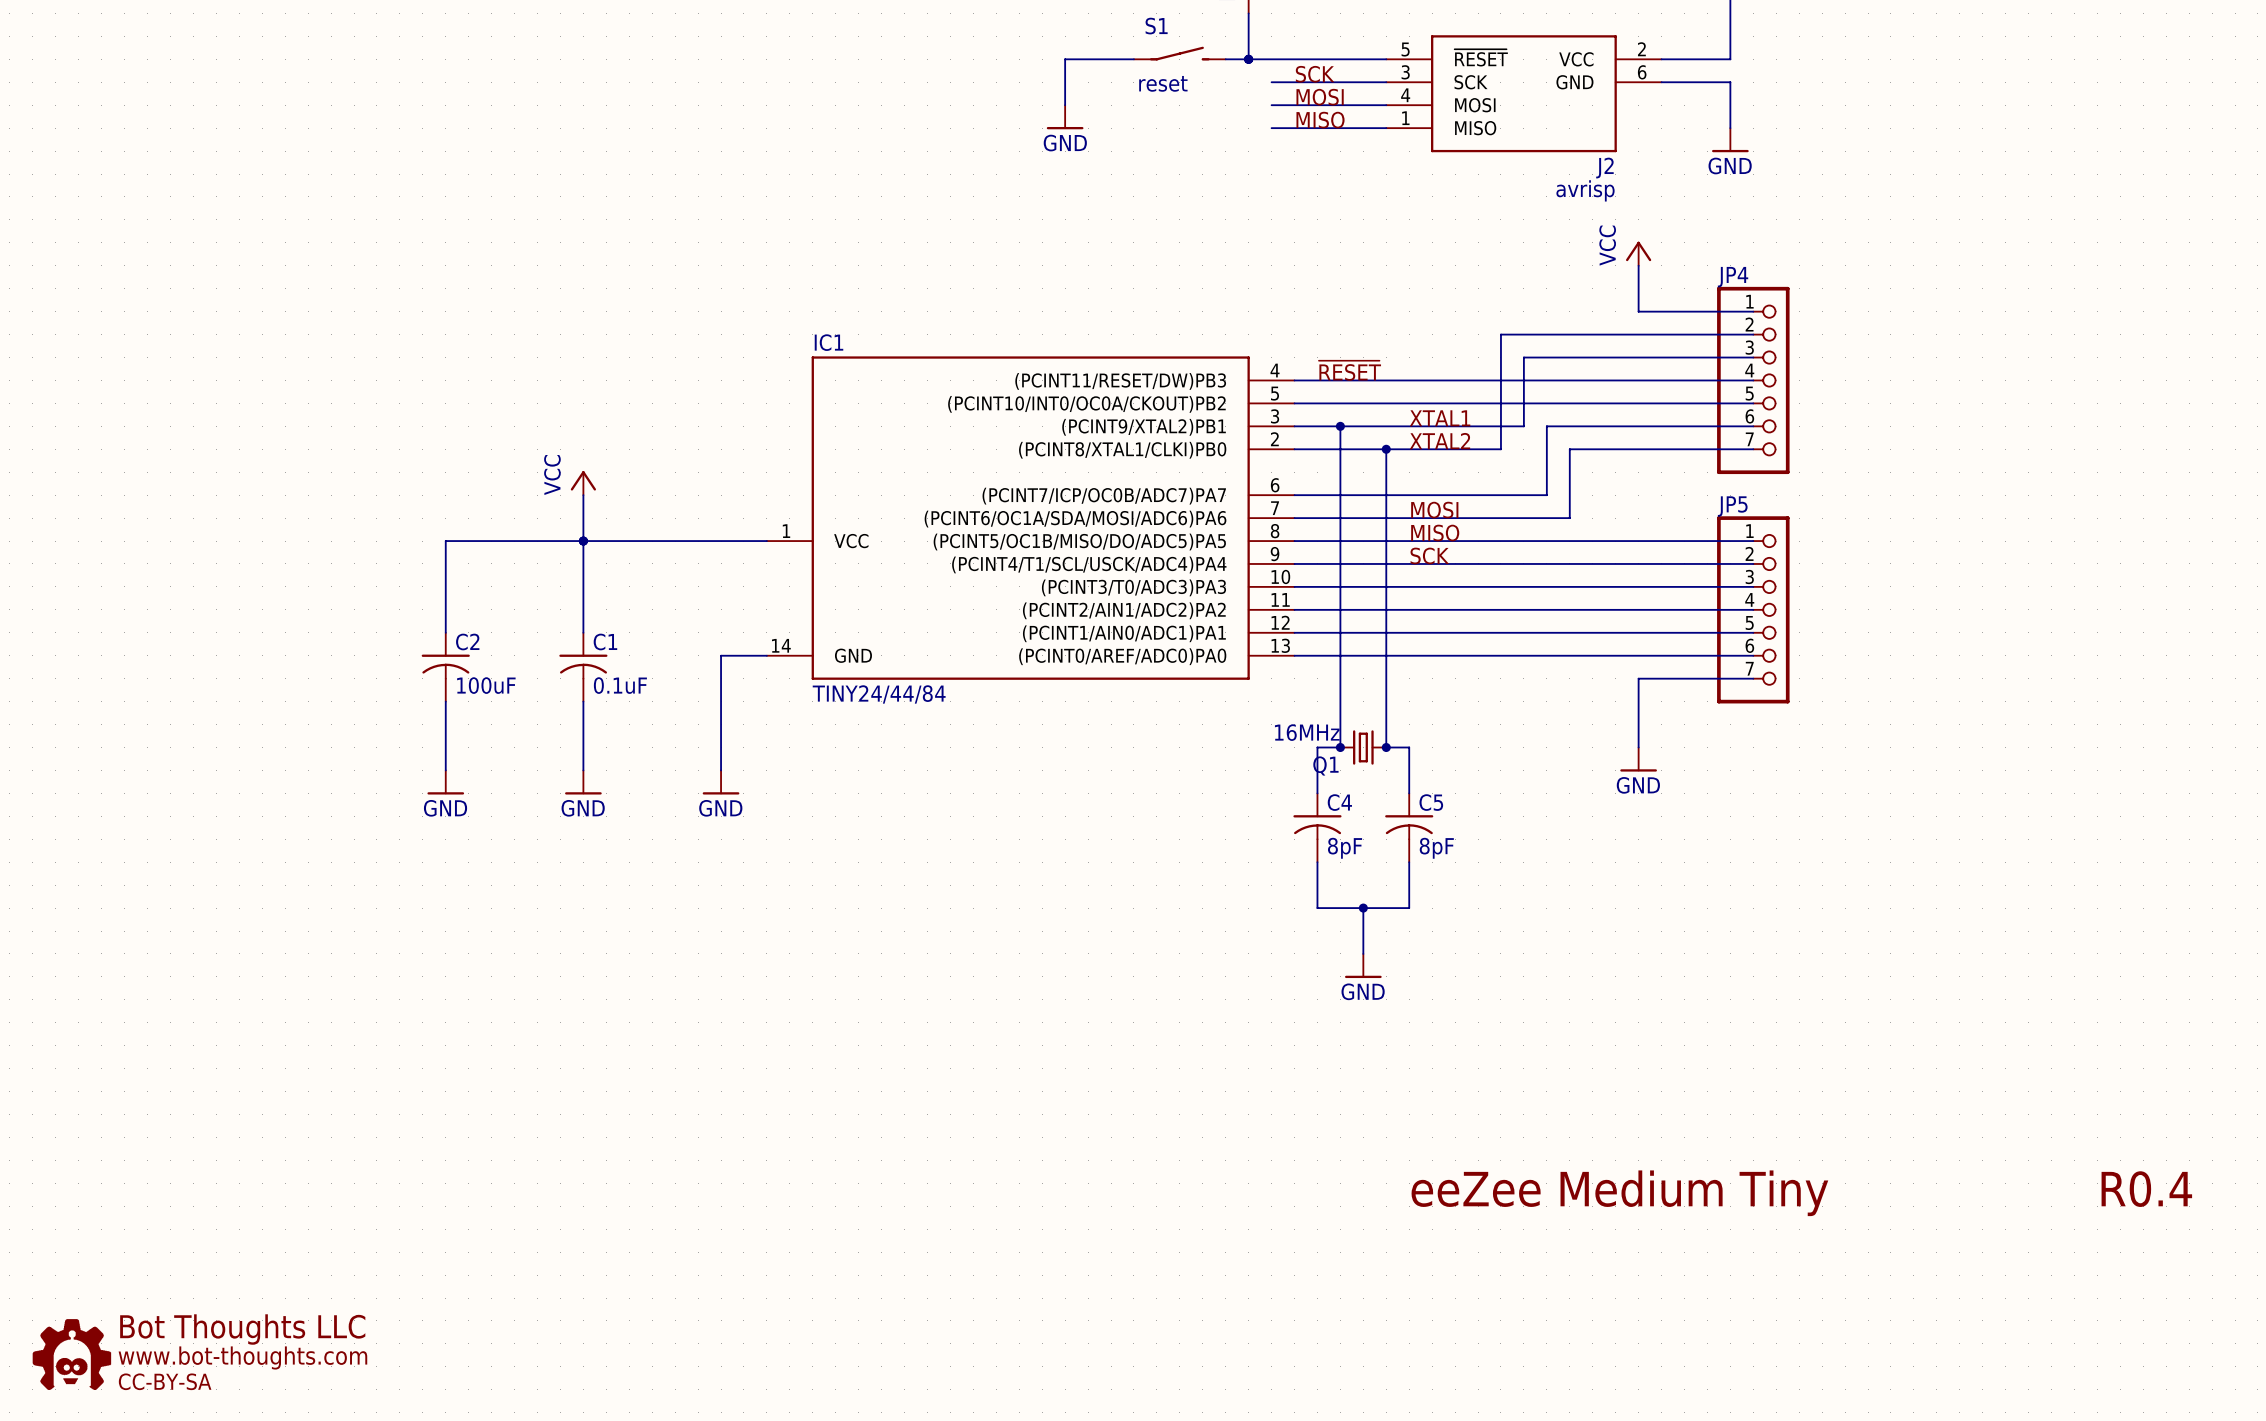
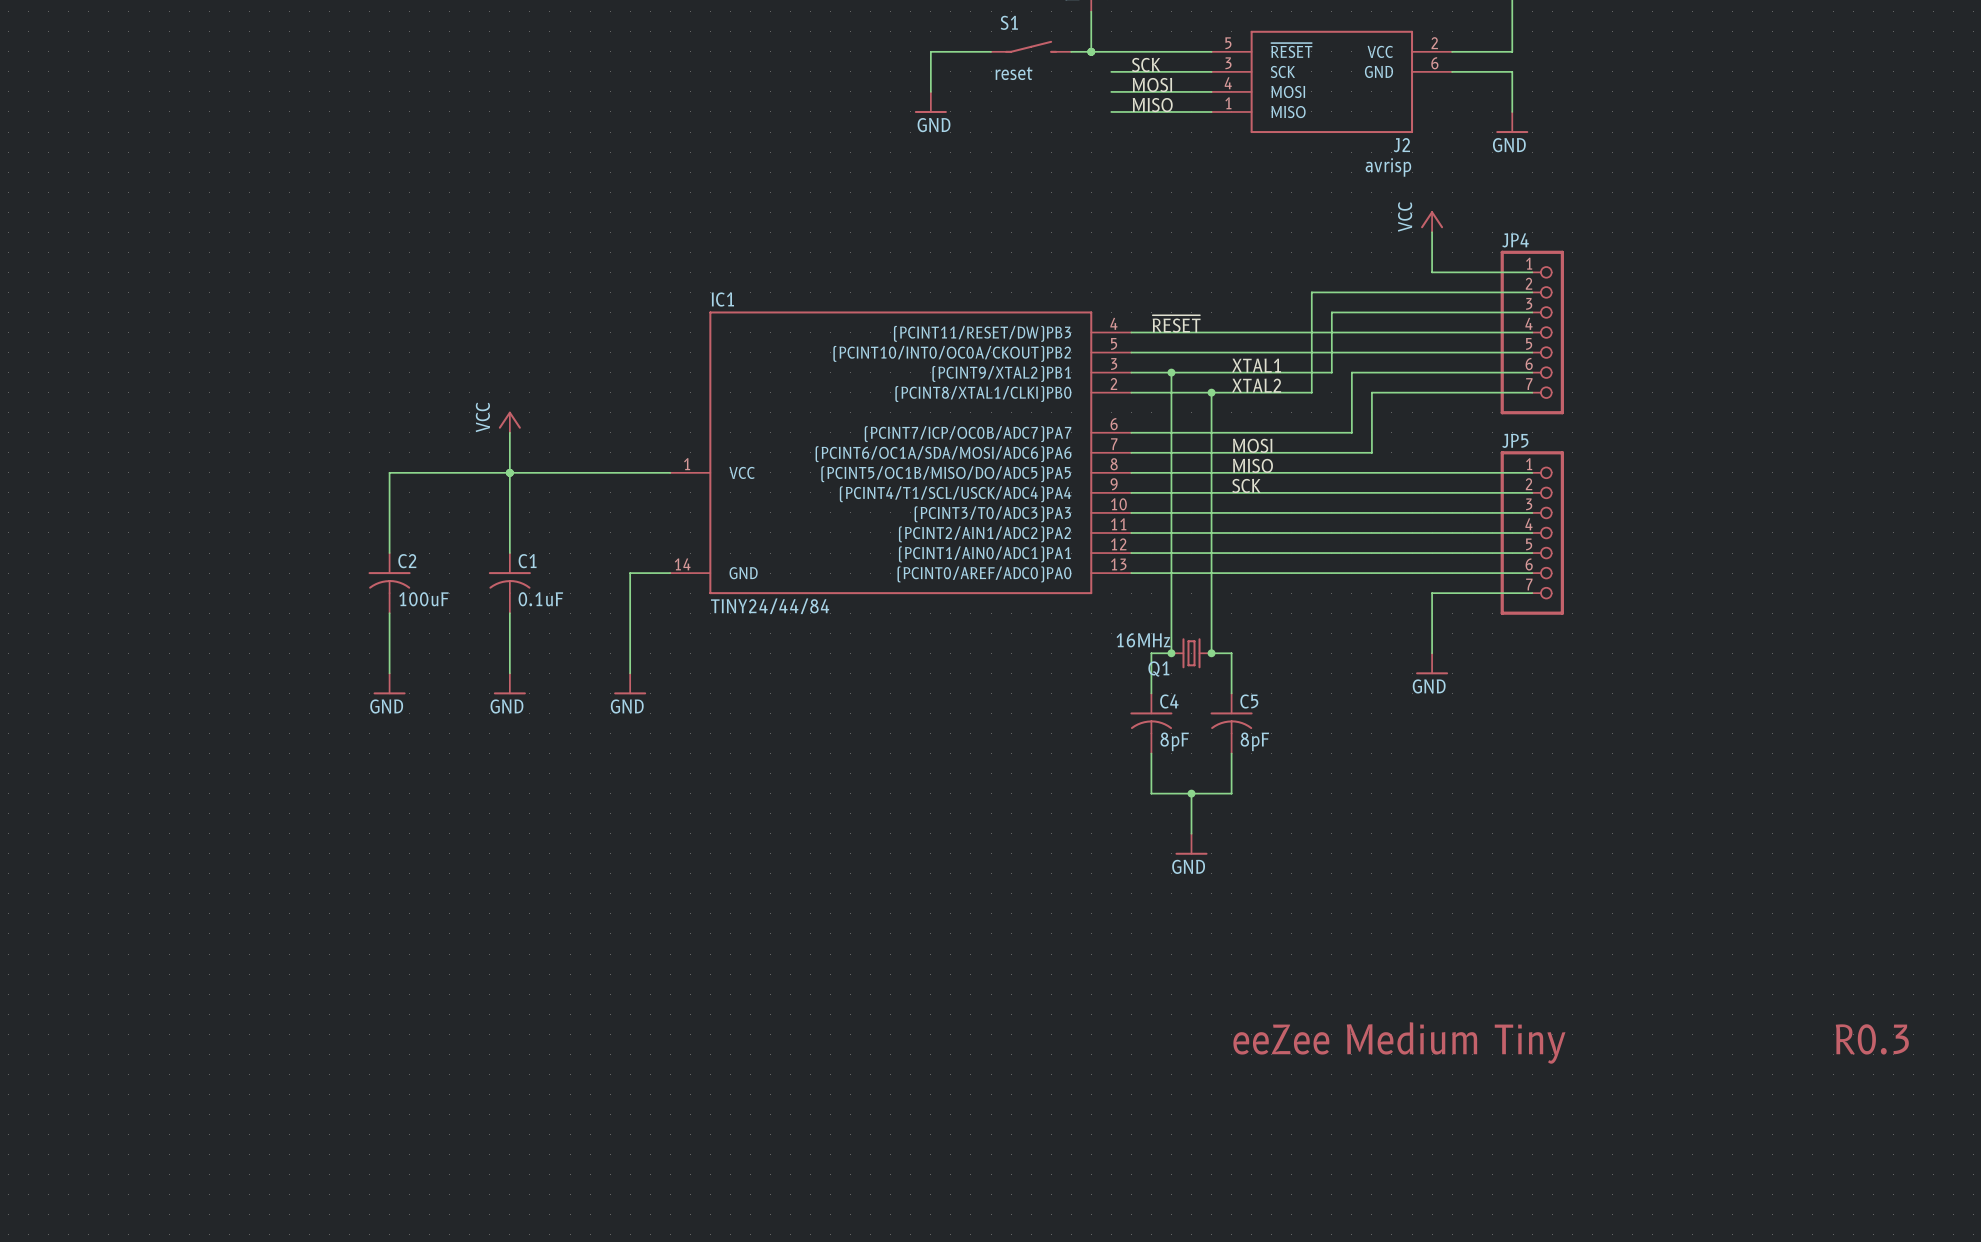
text: R0.4 (2146, 1189) -> R0.3 (1872, 1039)
part: (71, 1354) -> none

